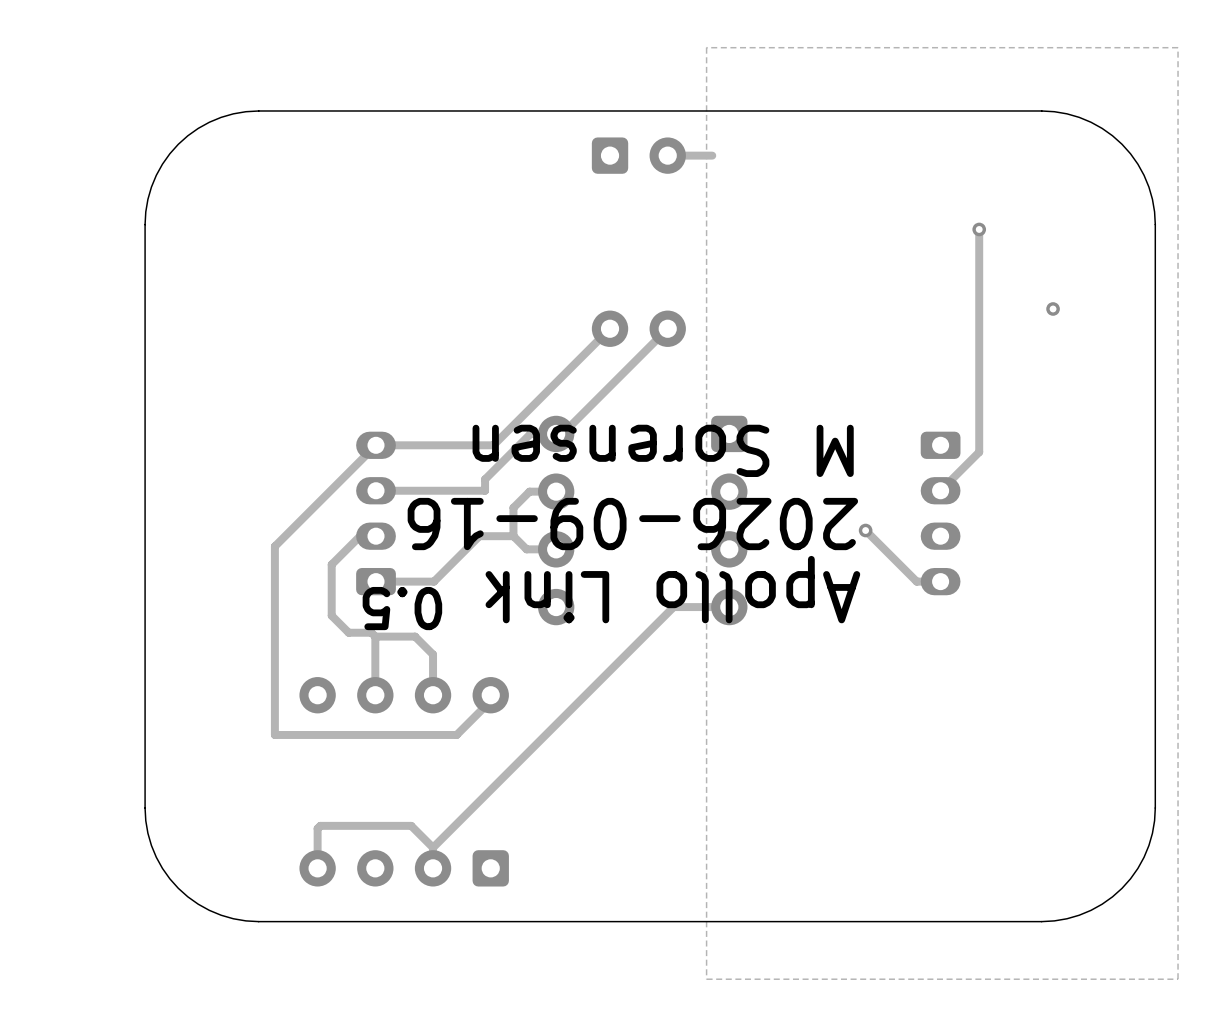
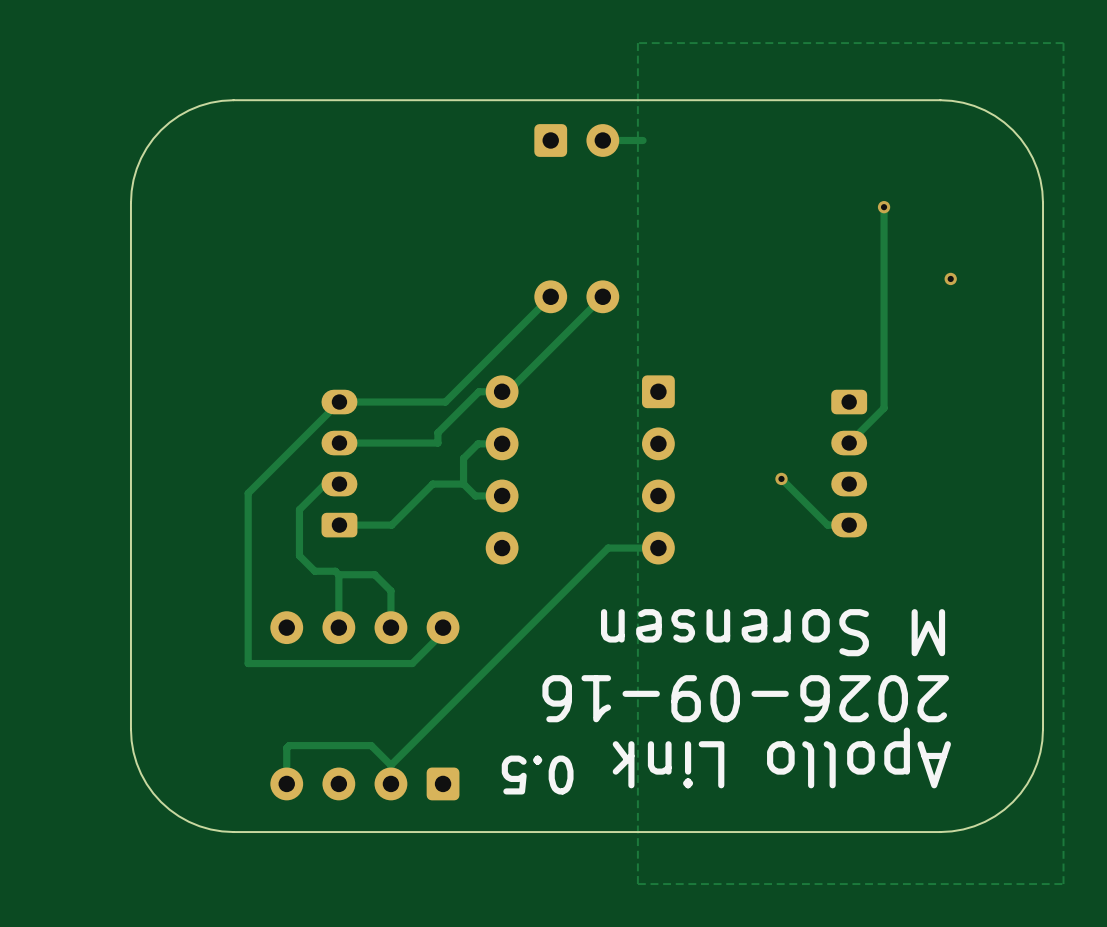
text position: M Sorensen (663, 450) -> M Sorensen (773, 632)
text position: 2026-09-16 (632, 524) -> 2026-09-16 (745, 698)
text position: Apollo Link 0.5 (611, 593) -> Apollo Link 0.5 (726, 761)

